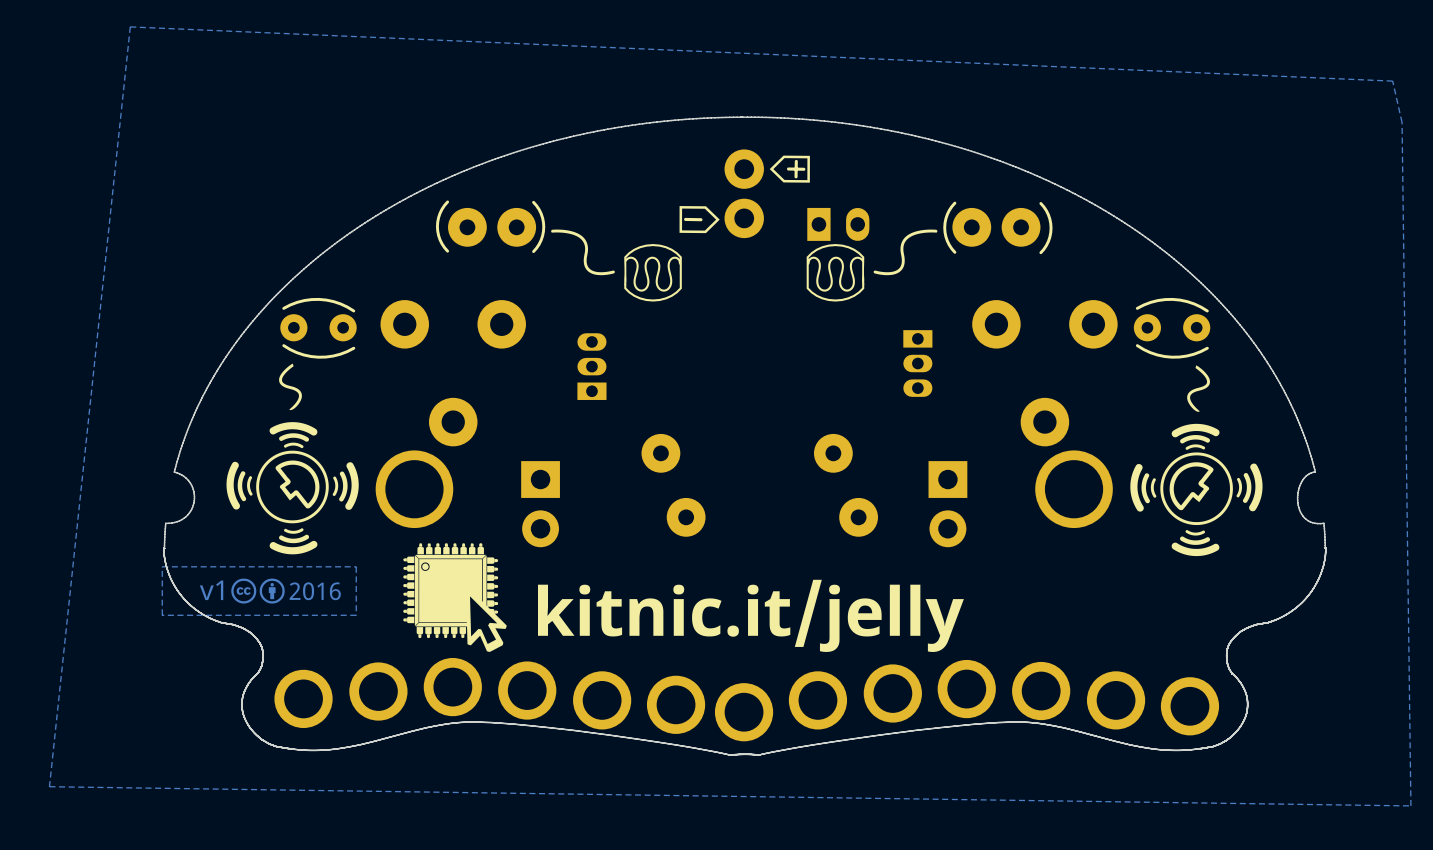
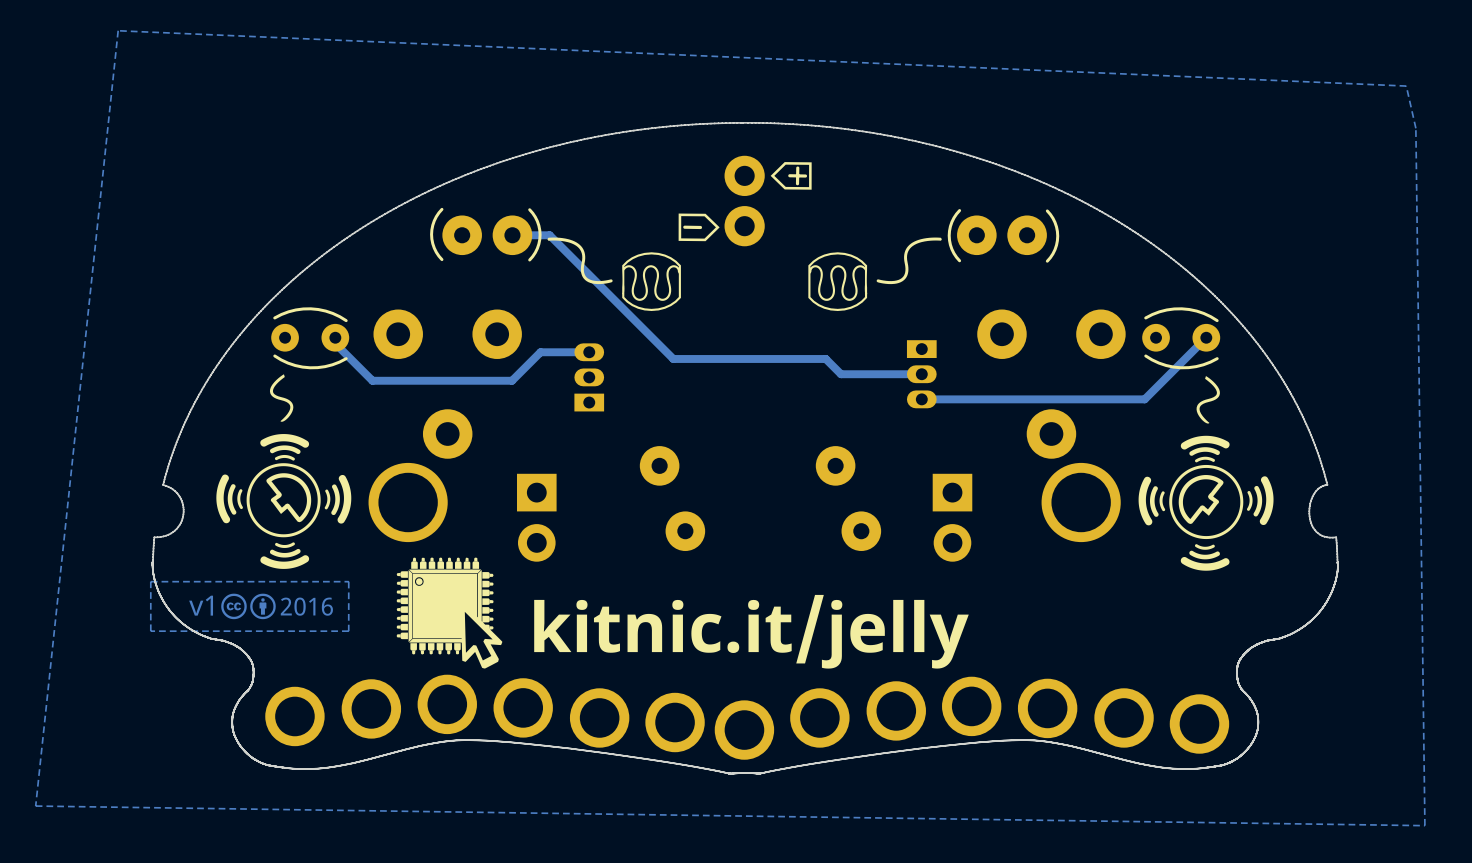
part: (838, 224) -> none
track: none -> (512, 235) (549, 235) (673, 358) (825, 358) (841, 374) (921, 374)
track: none -> (335, 337) (335, 343) (372, 380) (512, 380) (540, 352) (589, 352)
track: none -> (1206, 337) (1144, 399) (921, 399)

